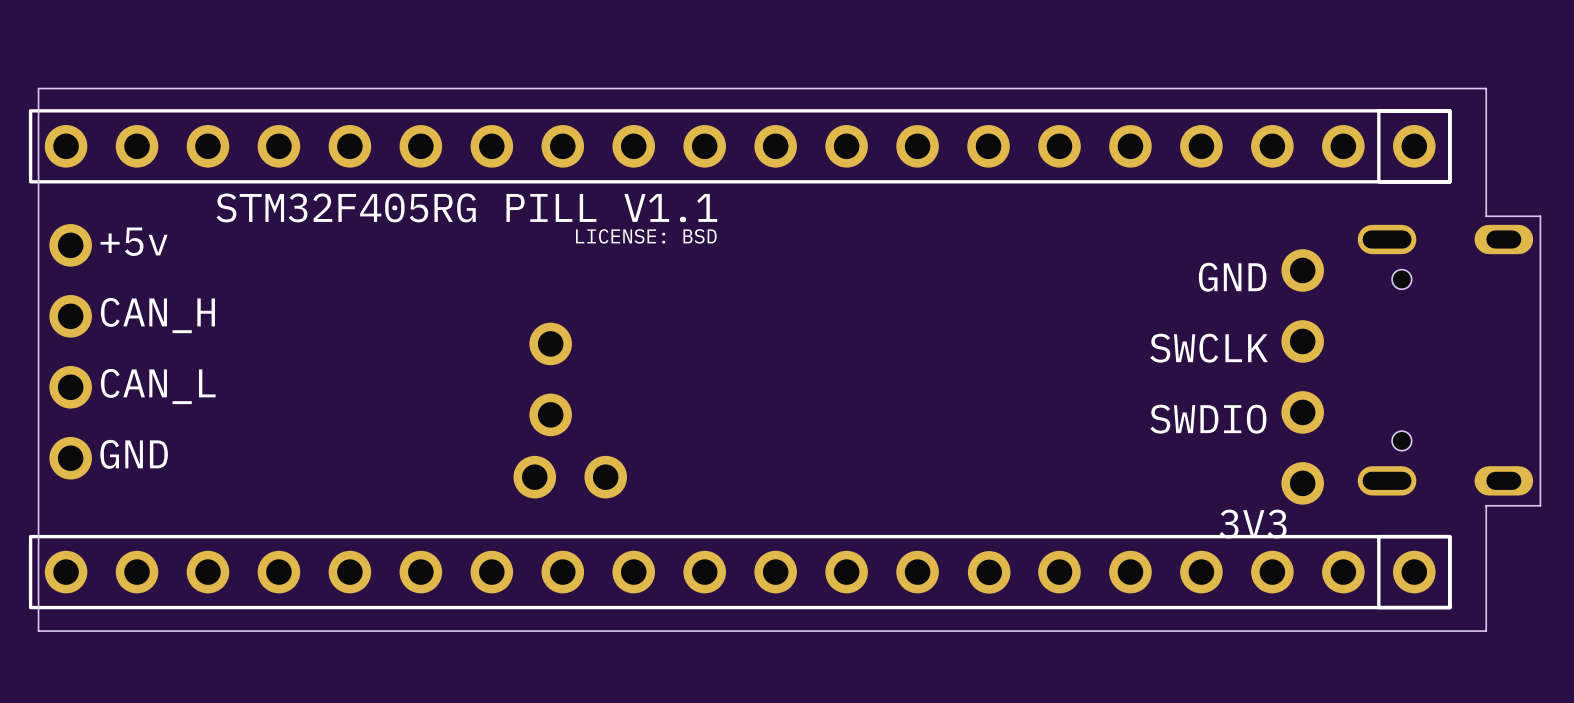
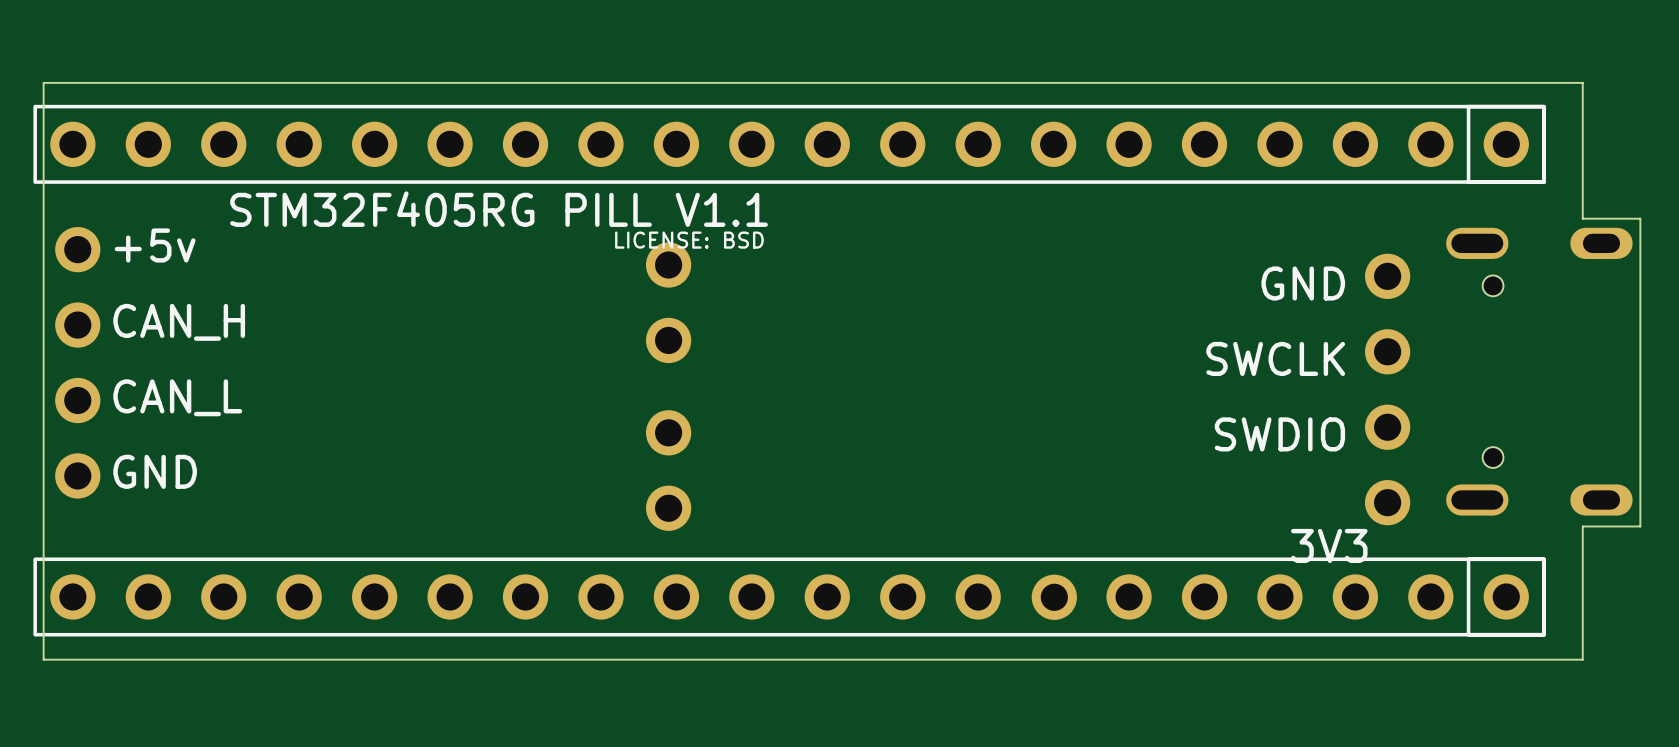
part: none -> (668, 302)
part: (550, 379) -> none
part: none -> (668, 470)
part: (570, 477) -> none

